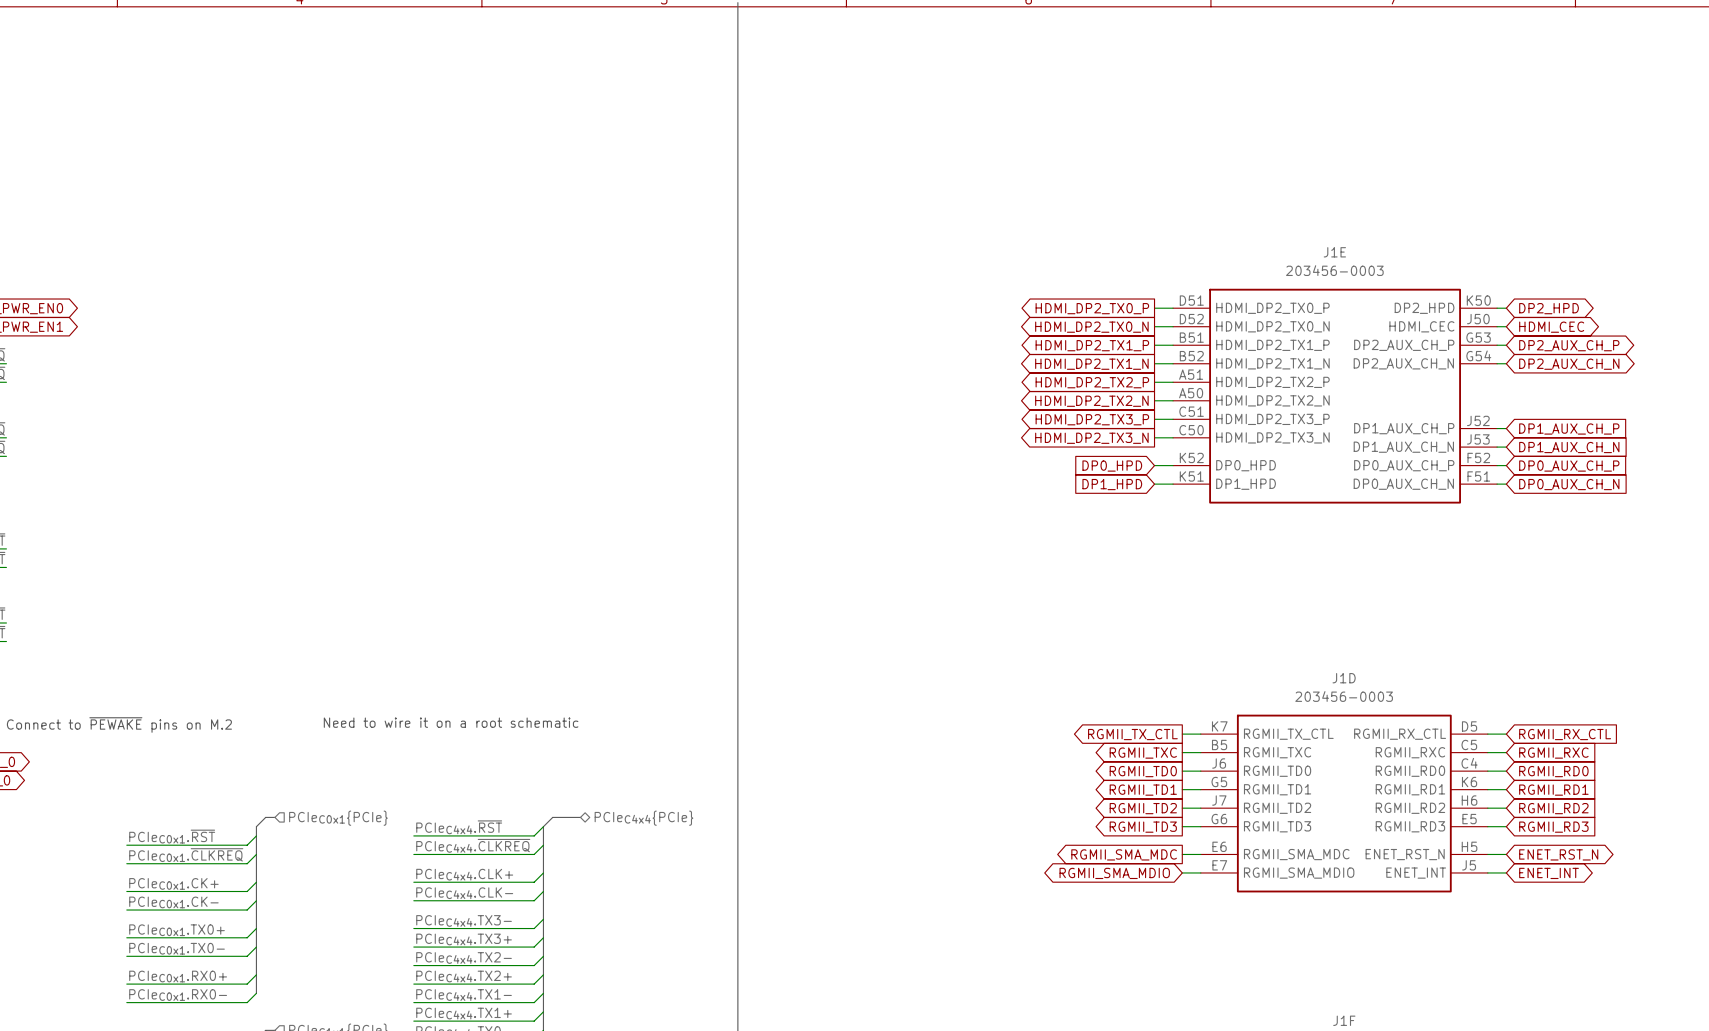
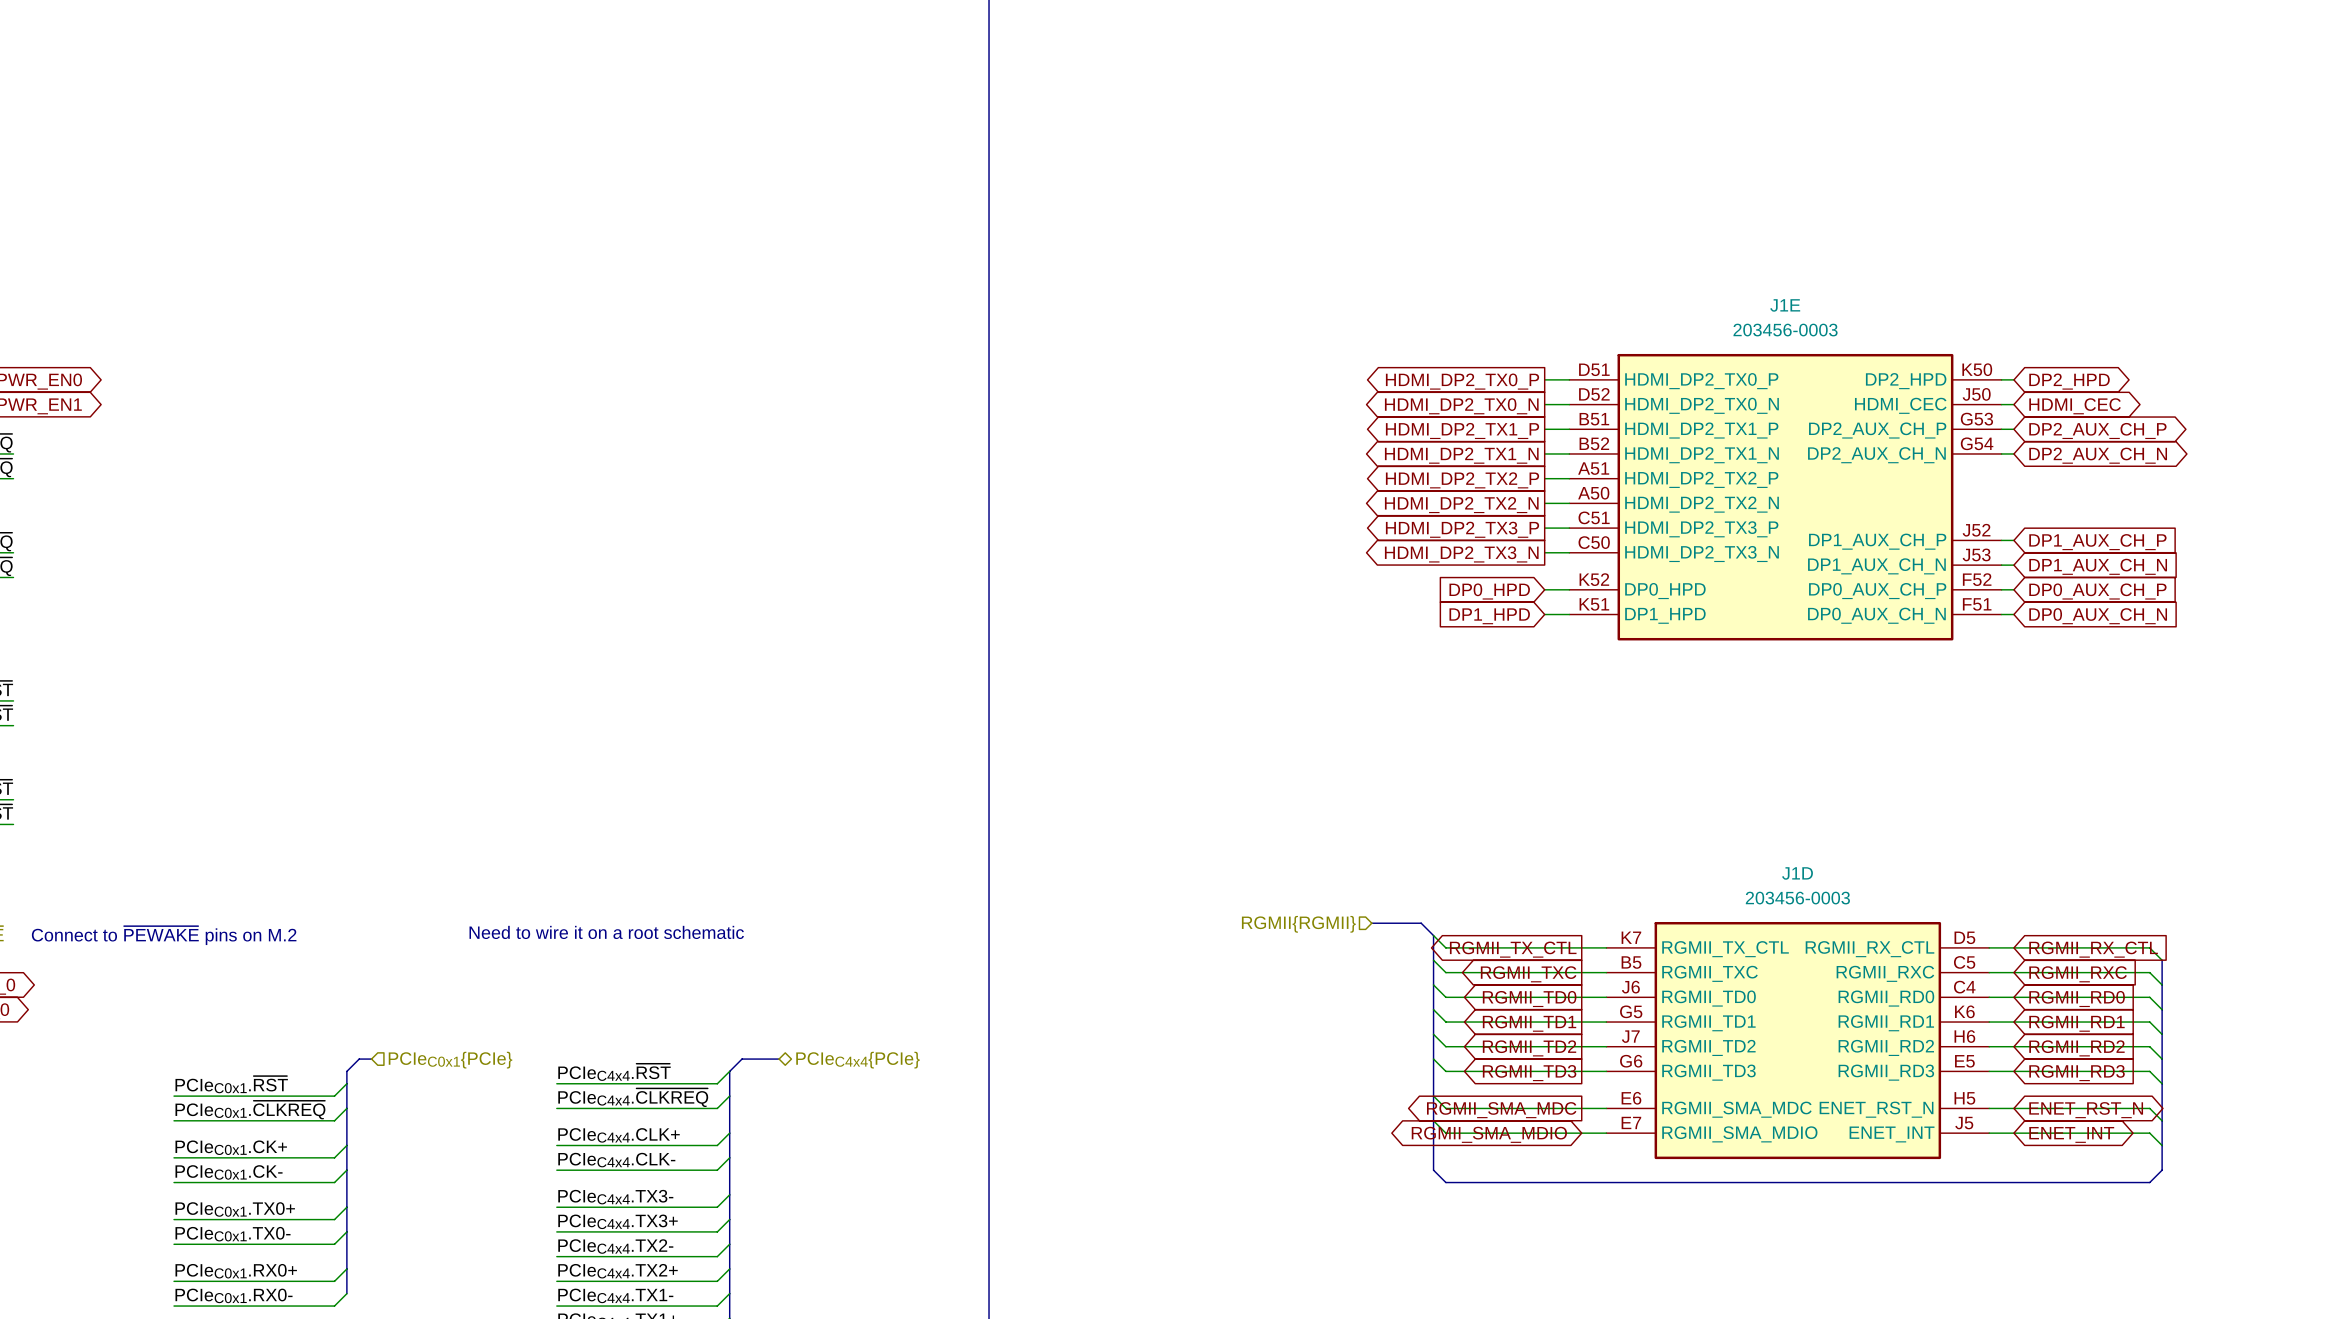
bus: none -> (1371, 923) (1421, 923) (1433, 935) (1433, 1170) (1445, 1182) (2149, 1182) (2162, 1170) (2162, 960)
hierarchical label: none -> RGMII{RGMII} (1298, 924)
wire: none -> (1433, 935) (1445, 947) (1581, 947)
wire: none -> (2013, 947) (2149, 947) (2162, 960)
wire: none -> (1433, 960) (1445, 972) (1581, 972)
wire: none -> (2013, 972) (2149, 972) (2162, 984)
wire: none -> (1433, 984) (1445, 997) (1581, 997)
wire: none -> (2013, 997) (2149, 997) (2162, 1009)
wire: none -> (1433, 1009) (1445, 1022) (1581, 1022)
wire: none -> (2013, 1022) (2149, 1022) (2162, 1034)
wire: none -> (1433, 1034) (1445, 1046) (1581, 1046)
wire: none -> (2013, 1046) (2149, 1046) (2162, 1059)
wire: none -> (1433, 1059) (1445, 1071) (1581, 1071)
wire: none -> (2013, 1071) (2149, 1071) (2162, 1083)
wire: none -> (1433, 1096) (1445, 1108) (1581, 1108)
wire: none -> (2013, 1108) (2149, 1108) (2162, 1120)
wire: none -> (1433, 1120) (1445, 1133) (1581, 1133)
wire: none -> (2013, 1133) (2149, 1133) (2162, 1145)

